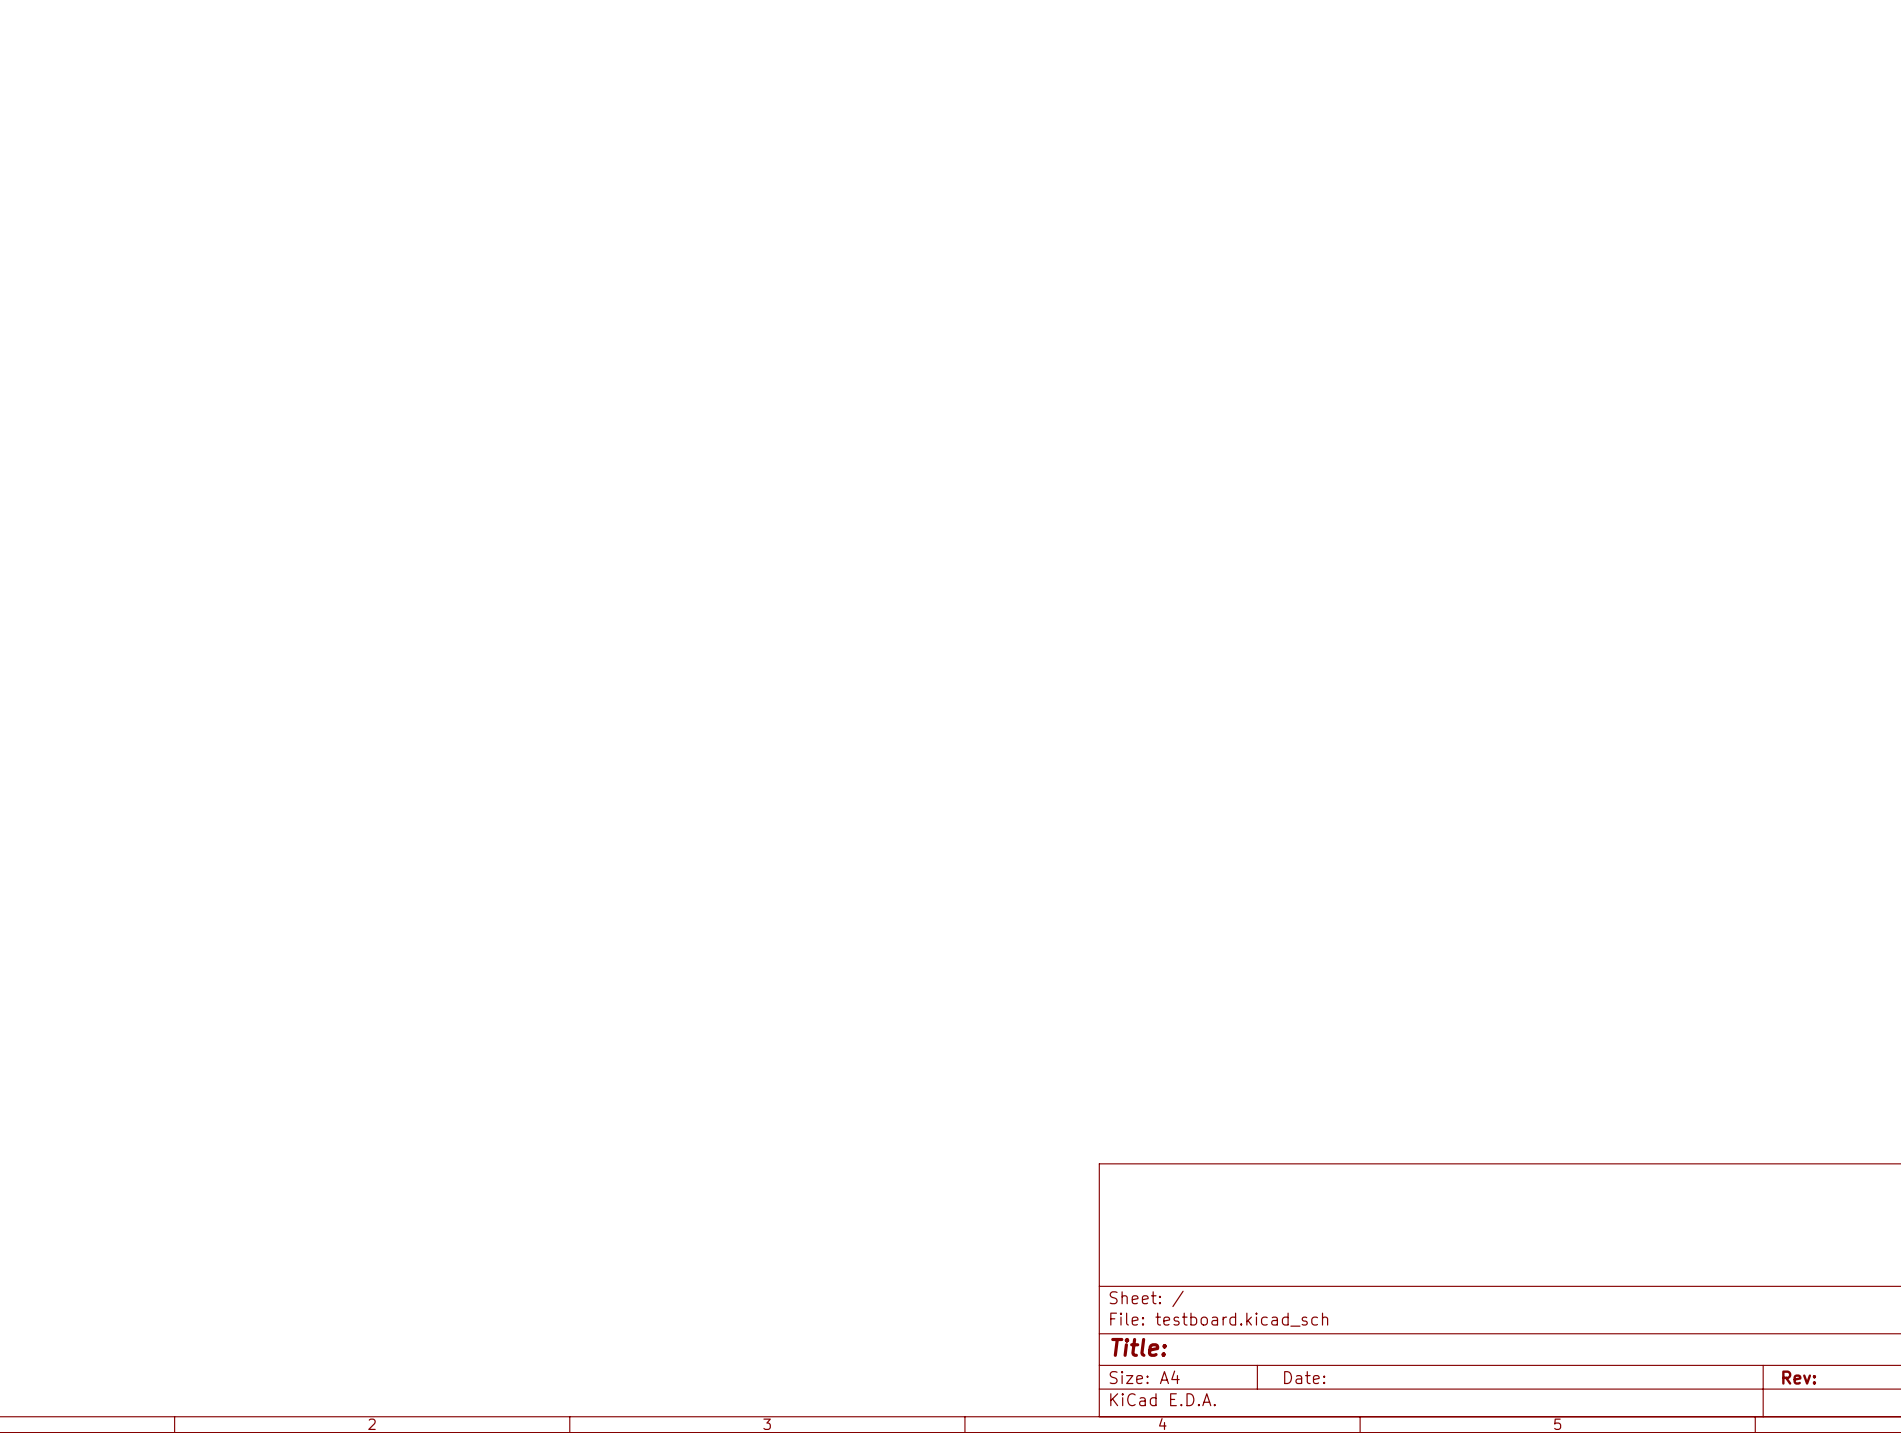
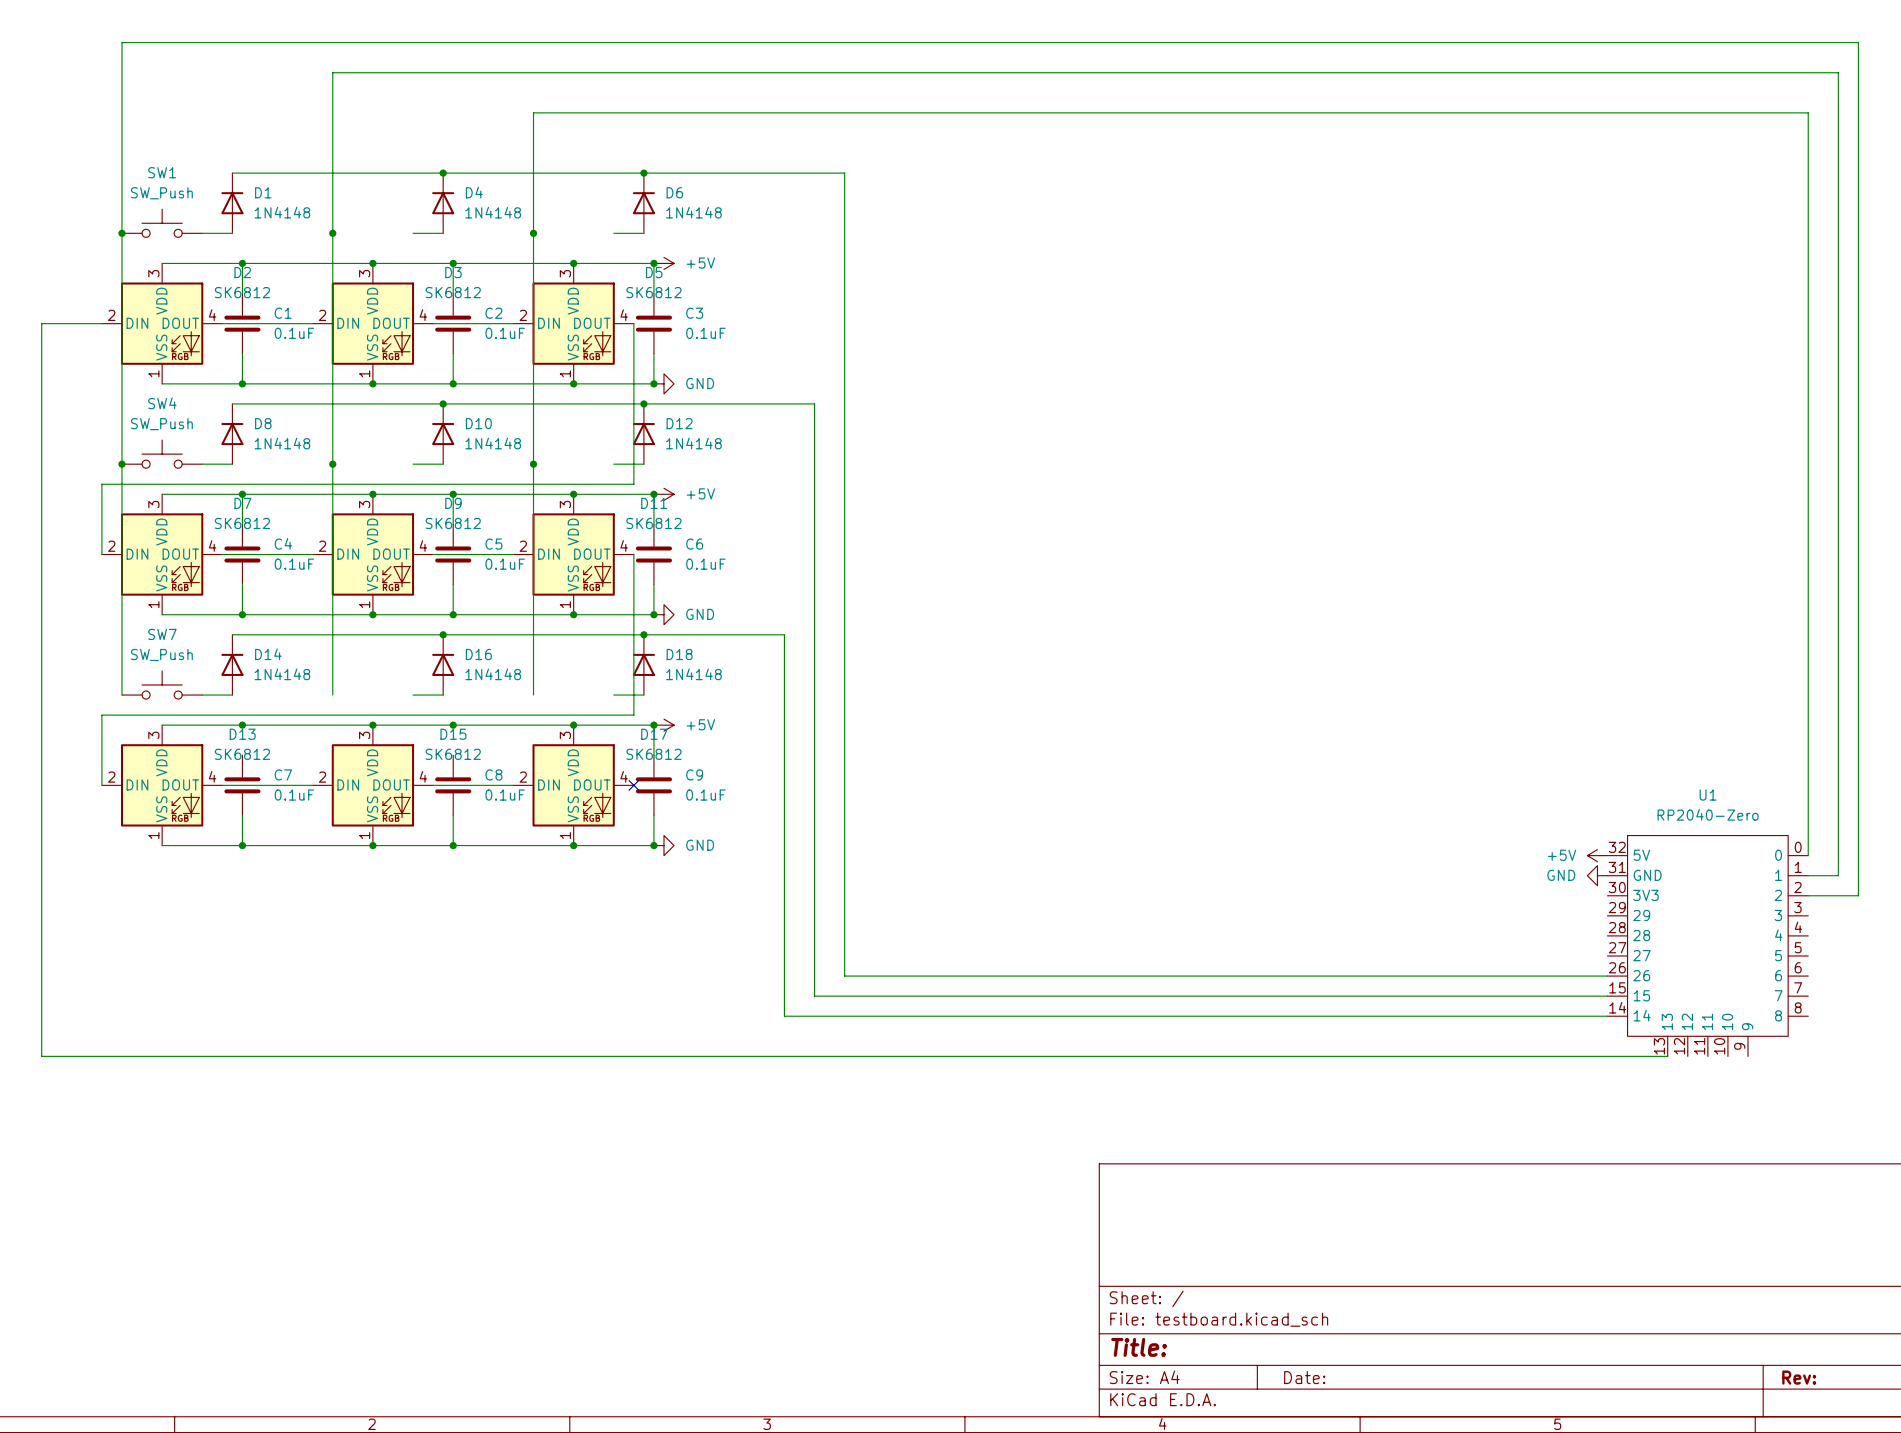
wire: none -> (232, 173) (844, 173) (844, 976) (1607, 976)
junction: none -> (443, 173)
junction: none -> (643, 173)
D1: none -> 1N4148 (232, 203)
D4: none -> 1N4148 (443, 203)
D6: none -> 1N4148 (643, 203)
SW1: none -> SW_Push (162, 223)
junction: none -> (121, 233)
wire: none -> (202, 233) (232, 233)
junction: none -> (332, 233)
wire: none -> (413, 233) (443, 233)
junction: none -> (533, 233)
wire: none -> (613, 233) (643, 233)
wire: none -> (162, 263) (653, 263) (653, 293)
wire: none -> (242, 263) (242, 293)
junction: none -> (242, 263)
junction: none -> (372, 263)
wire: none -> (453, 263) (453, 293)
junction: none -> (453, 263)
junction: none -> (573, 263)
junction: none -> (653, 263)
power symbol: none -> +5V (663, 263)
wire: none -> (101, 323) (41, 323) (41, 1056) (1667, 1056)
D2: none -> SK6812 (162, 323)
wire: none -> (222, 323) (312, 323)
C1: none -> 0.1uF (242, 323)
D3: none -> SK6812 (372, 323)
wire: none -> (433, 323) (513, 323)
C2: none -> 0.1uF (453, 323)
D5: none -> SK6812 (573, 323)
wire: none -> (633, 323) (633, 484) (101, 484) (101, 554)
C3: none -> 0.1uF (653, 323)
wire: none -> (242, 353) (242, 383)
wire: none -> (453, 353) (453, 383)
wire: none -> (653, 353) (653, 383) (162, 383)
junction: none -> (242, 383)
junction: none -> (372, 383)
junction: none -> (453, 383)
junction: none -> (573, 383)
junction: none -> (653, 383)
power symbol: none -> GND (663, 383)
wire: none -> (232, 403) (814, 403) (814, 996) (1607, 996)
junction: none -> (443, 403)
junction: none -> (643, 403)
D8: none -> 1N4148 (232, 434)
D10: none -> 1N4148 (443, 434)
D12: none -> 1N4148 (643, 434)
SW4: none -> SW_Push (162, 454)
junction: none -> (121, 464)
wire: none -> (202, 464) (232, 464)
junction: none -> (332, 464)
wire: none -> (413, 464) (443, 464)
junction: none -> (533, 464)
wire: none -> (613, 464) (643, 464)
wire: none -> (162, 494) (653, 494) (653, 524)
wire: none -> (242, 494) (242, 524)
junction: none -> (242, 494)
junction: none -> (372, 494)
wire: none -> (453, 494) (453, 524)
junction: none -> (453, 494)
junction: none -> (573, 494)
junction: none -> (653, 494)
power symbol: none -> +5V (663, 494)
D7: none -> SK6812 (162, 554)
wire: none -> (222, 554) (312, 554)
C4: none -> 0.1uF (242, 554)
D9: none -> SK6812 (372, 554)
wire: none -> (433, 554) (513, 554)
C5: none -> 0.1uF (453, 554)
D11: none -> SK6812 (573, 554)
wire: none -> (633, 554) (633, 715) (101, 715) (101, 785)
C6: none -> 0.1uF (653, 554)
wire: none -> (242, 584) (242, 614)
wire: none -> (453, 584) (453, 614)
wire: none -> (653, 584) (653, 614) (162, 614)
junction: none -> (242, 614)
junction: none -> (372, 614)
junction: none -> (453, 614)
junction: none -> (573, 614)
junction: none -> (653, 614)
power symbol: none -> GND (663, 614)
wire: none -> (232, 634) (784, 634) (784, 1016) (1607, 1016)
junction: none -> (443, 634)
junction: none -> (643, 634)
D14: none -> 1N4148 (232, 664)
D16: none -> 1N4148 (443, 664)
D18: none -> 1N4148 (643, 664)
SW7: none -> SW_Push (162, 684)
wire: none -> (121, 695) (121, 42) (1858, 42) (1858, 895) (1808, 895)
wire: none -> (202, 695) (232, 695)
wire: none -> (332, 695) (332, 72) (1838, 72) (1838, 875) (1808, 875)
wire: none -> (413, 695) (443, 695)
wire: none -> (533, 695) (533, 112) (1808, 112) (1808, 855)
wire: none -> (613, 695) (643, 695)
wire: none -> (162, 725) (653, 725) (653, 755)
junction: none -> (242, 725)
junction: none -> (372, 725)
junction: none -> (453, 725)
junction: none -> (573, 725)
junction: none -> (653, 725)
power symbol: none -> +5V (663, 725)
D13: none -> SK6812 (162, 785)
wire: none -> (222, 785) (312, 785)
C7: none -> 0.1uF (242, 785)
D15: none -> SK6812 (372, 785)
wire: none -> (433, 785) (513, 785)
C8: none -> 0.1uF (453, 785)
D17: none -> SK6812 (573, 785)
no-connect mark: none -> (633, 785)
C9: none -> 0.1uF (653, 785)
wire: none -> (242, 815) (242, 845)
wire: none -> (453, 815) (453, 845)
wire: none -> (653, 815) (653, 845) (162, 845)
junction: none -> (242, 845)
junction: none -> (372, 845)
junction: none -> (453, 845)
junction: none -> (573, 845)
junction: none -> (653, 845)
power symbol: none -> GND (663, 845)
power symbol: none -> +5V (1597, 855)
power symbol: none -> GND (1597, 875)
U1: none -> RP2040-Zero (1707, 945)

